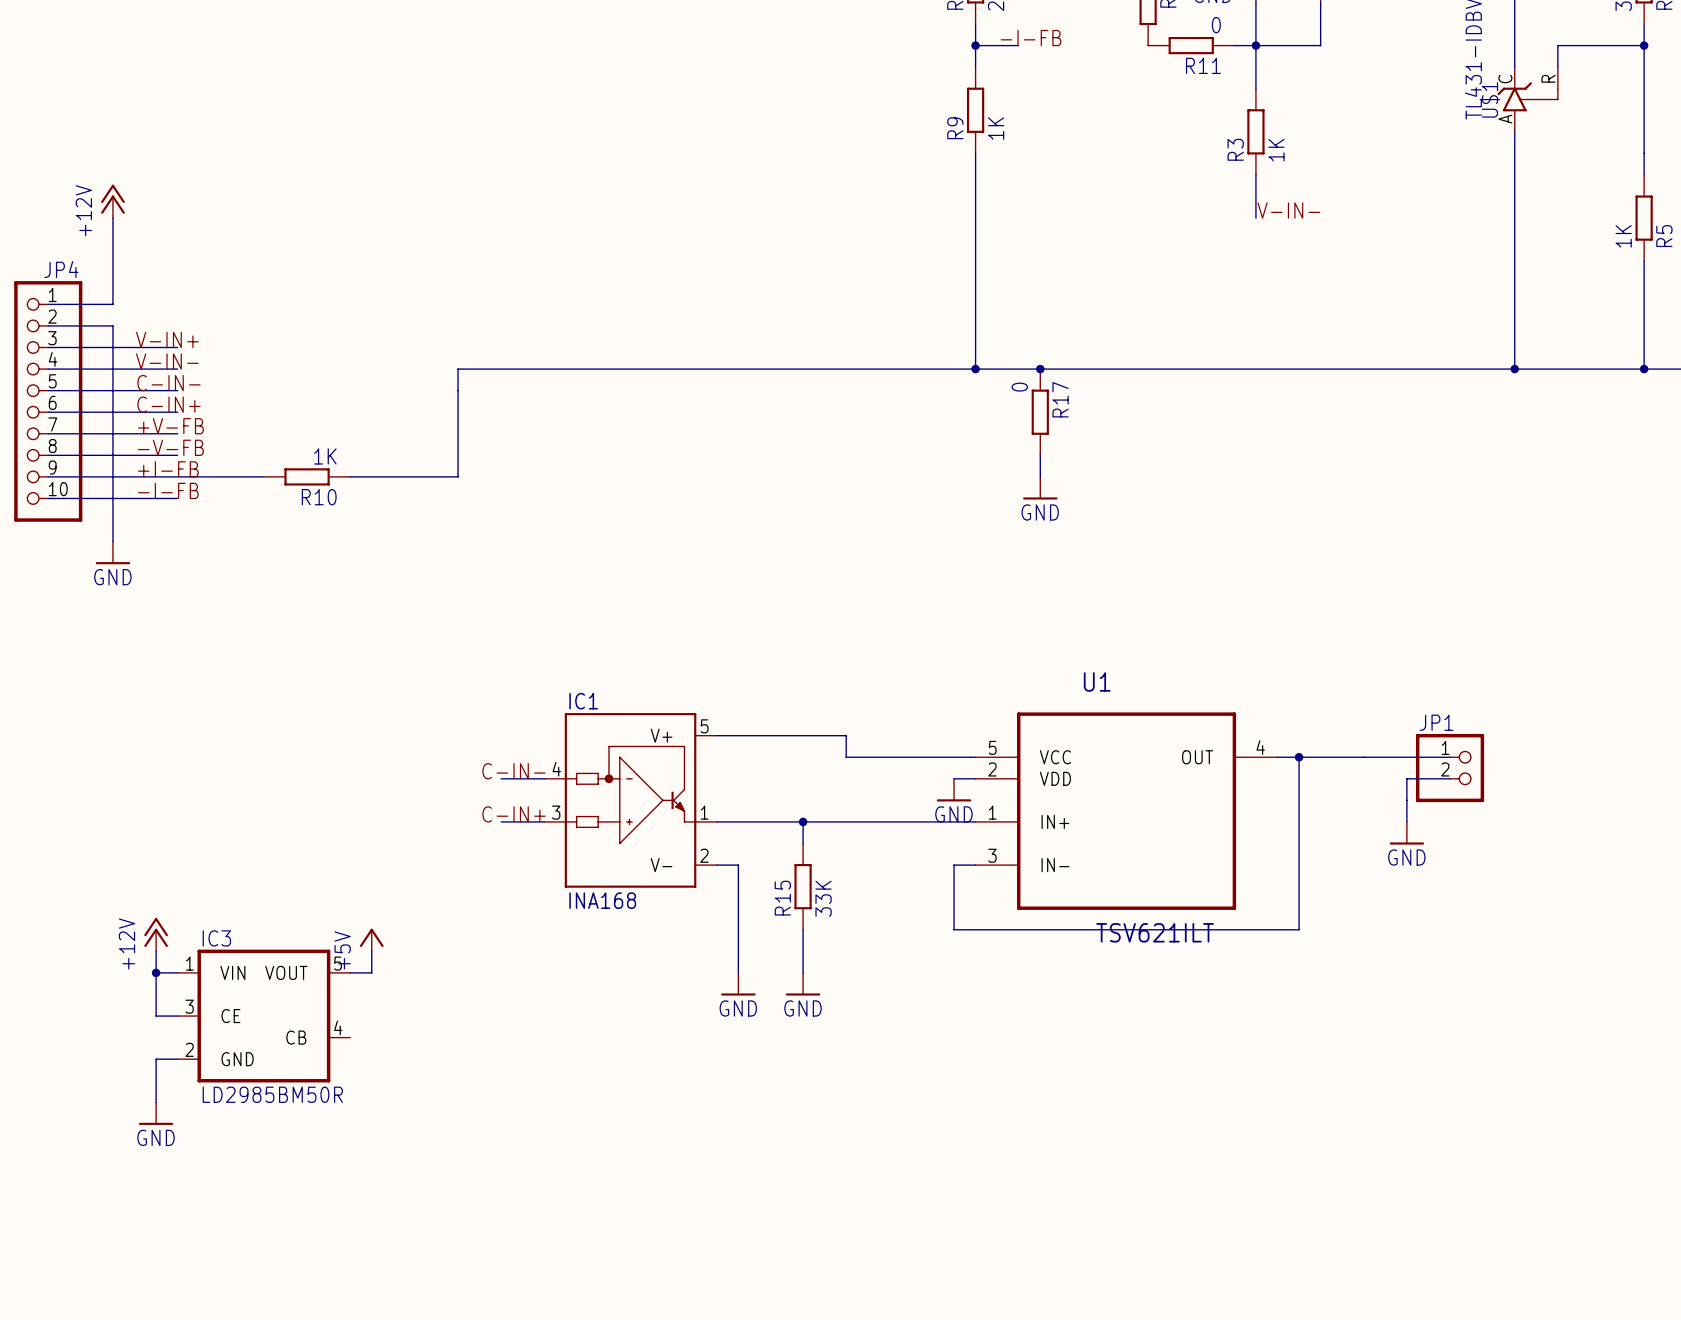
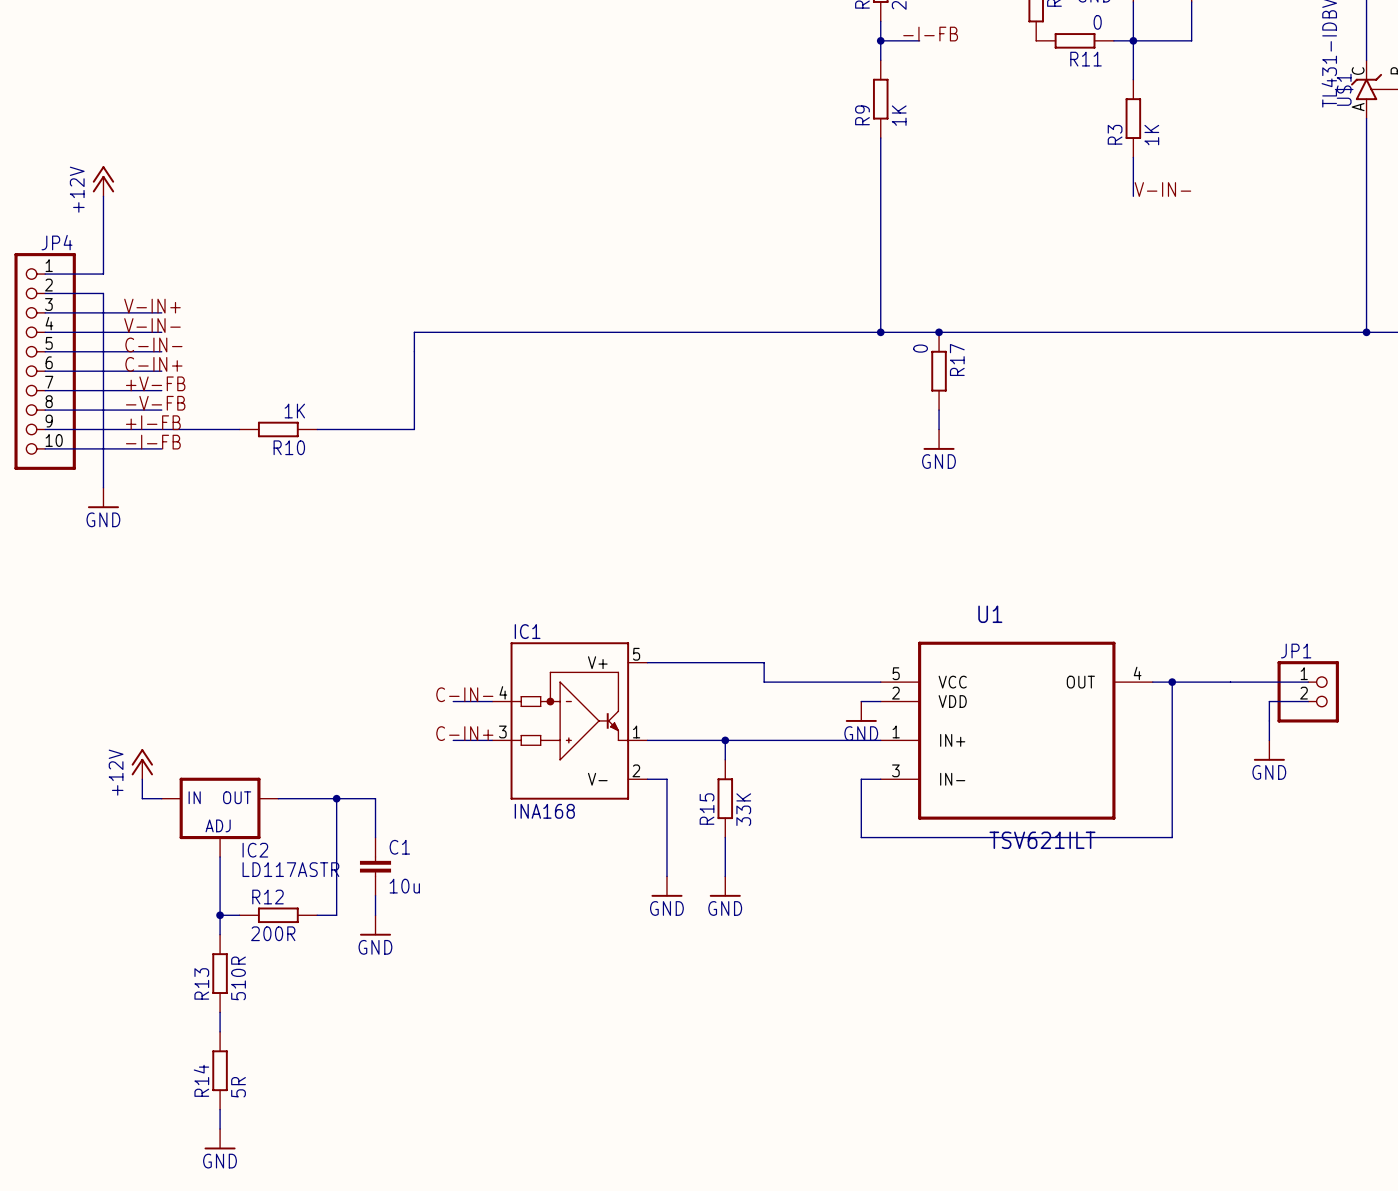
wire: none -> (142, 779) (142, 798) (161, 798)
wire: none -> (278, 798) (375, 798) (375, 837)
wire: none -> (336, 798) (336, 856)
junction: none -> (336, 798)
IC2: none -> LD117ASTR (220, 817)
power symbol position: +12V (156, 934) -> +12V (142, 764)
power symbol: +5V (371, 940) -> none
wire: (156, 951) (156, 1016) (177, 1016) -> none
wire: none -> (220, 856) (220, 934)
C1: none -> 10u (375, 866)
wire: (156, 972) (177, 972) -> (220, 915) (239, 915)
junction: (156, 972) -> none
wire: (350, 972) (371, 972) -> (317, 915) (336, 915) (336, 876)
wire: none -> (375, 895) (375, 915)
junction: none -> (220, 915)
IC3: LD2985BM50R (263, 1016) -> none
R12: none -> 200R (278, 915)
power symbol: none -> GND (375, 925)
wire: (177, 1059) (156, 1059) (156, 1102) -> none
R13: none -> 510R (220, 973)
power symbol: GND (156, 1113) -> none
wire: none -> (220, 1012) (220, 1031)
R14: none -> 5R (220, 1070)
wire: none -> (220, 1109) (220, 1129)
power symbol: none -> GND (220, 1139)

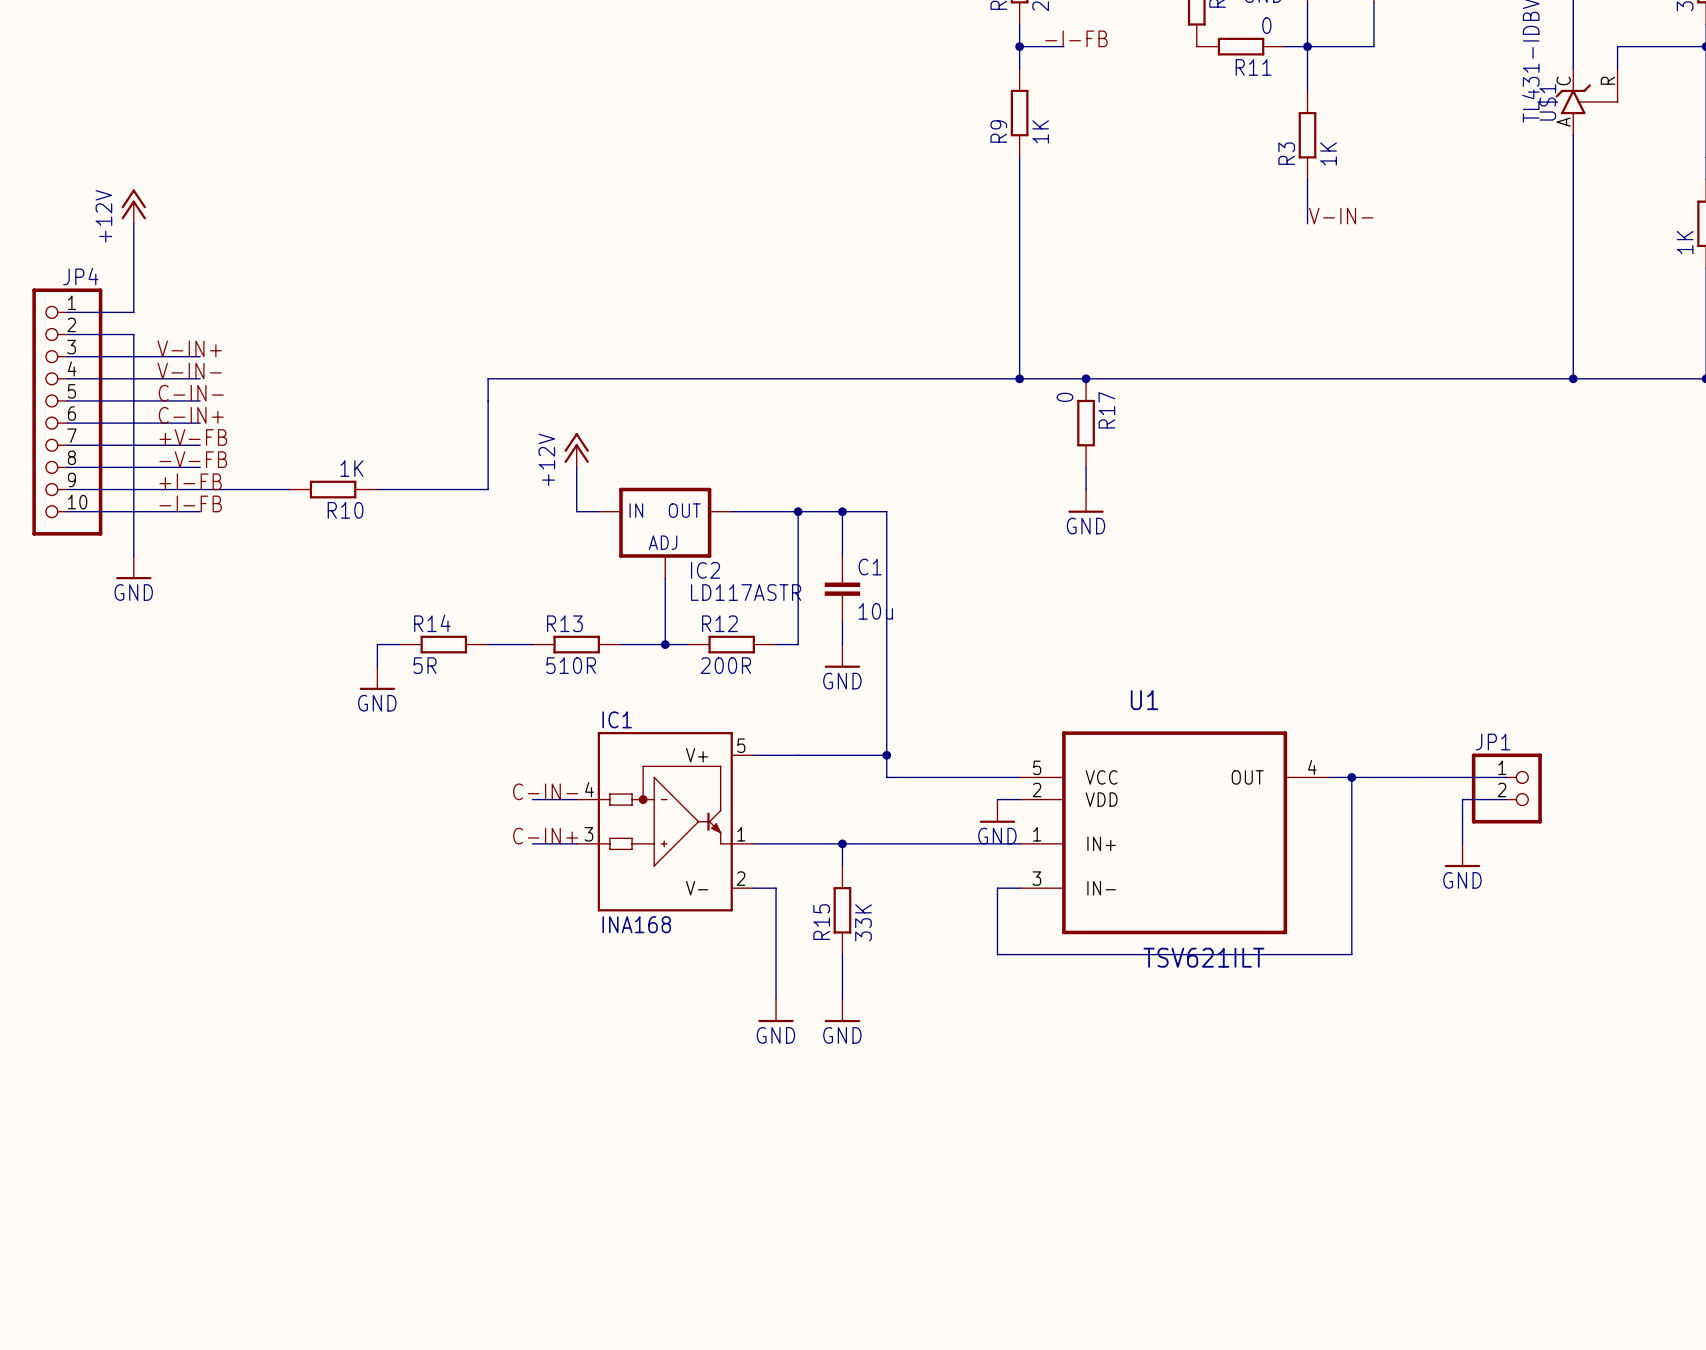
power symbol: none -> +12V (576, 450)
wire: none -> (576, 467) (576, 511) (598, 511)
wire: none -> (731, 511) (886, 511) (886, 755)
wire: none -> (798, 511) (798, 644) (776, 644)
junction: none -> (798, 511)
wire: none -> (842, 511) (842, 555)
junction: none -> (842, 511)
wire: none -> (665, 578) (665, 644)
wire: none -> (842, 622) (842, 644)
wire: none -> (399, 644) (377, 644) (377, 666)
wire: none -> (488, 644) (532, 644)
wire: none -> (620, 644) (687, 644)
junction: none -> (665, 644)
power symbol: none -> GND (842, 656)
power symbol: none -> GND (377, 678)
junction: none -> (886, 755)
power symbol: +12V (142, 764) -> none
wire: (142, 779) (142, 798) (161, 798) -> none
wire: (278, 798) (375, 798) (375, 837) -> none
wire: (336, 798) (336, 915) (317, 915) -> none
junction: (336, 798) -> none
IC2 position: (220, 817) -> (665, 532)
wire: (220, 856) (220, 934) -> none
C1 position: (375, 866) -> (842, 589)
wire: (375, 895) (375, 915) -> none
wire: (220, 915) (239, 915) -> none
junction: (220, 915) -> none
R12 position: (278, 915) -> (731, 644)
power symbol: GND (375, 925) -> none
R13 rotation: 0° (220, 973) -> 90° clockwise (576, 644)
R13 position: (220, 973) -> (576, 644)
wire: (220, 1012) (220, 1031) -> none
R14 rotation: 0° (220, 1070) -> 90° clockwise (443, 644)
R14 position: (220, 1070) -> (443, 644)
wire: (220, 1109) (220, 1129) -> none
power symbol: GND (220, 1139) -> none

